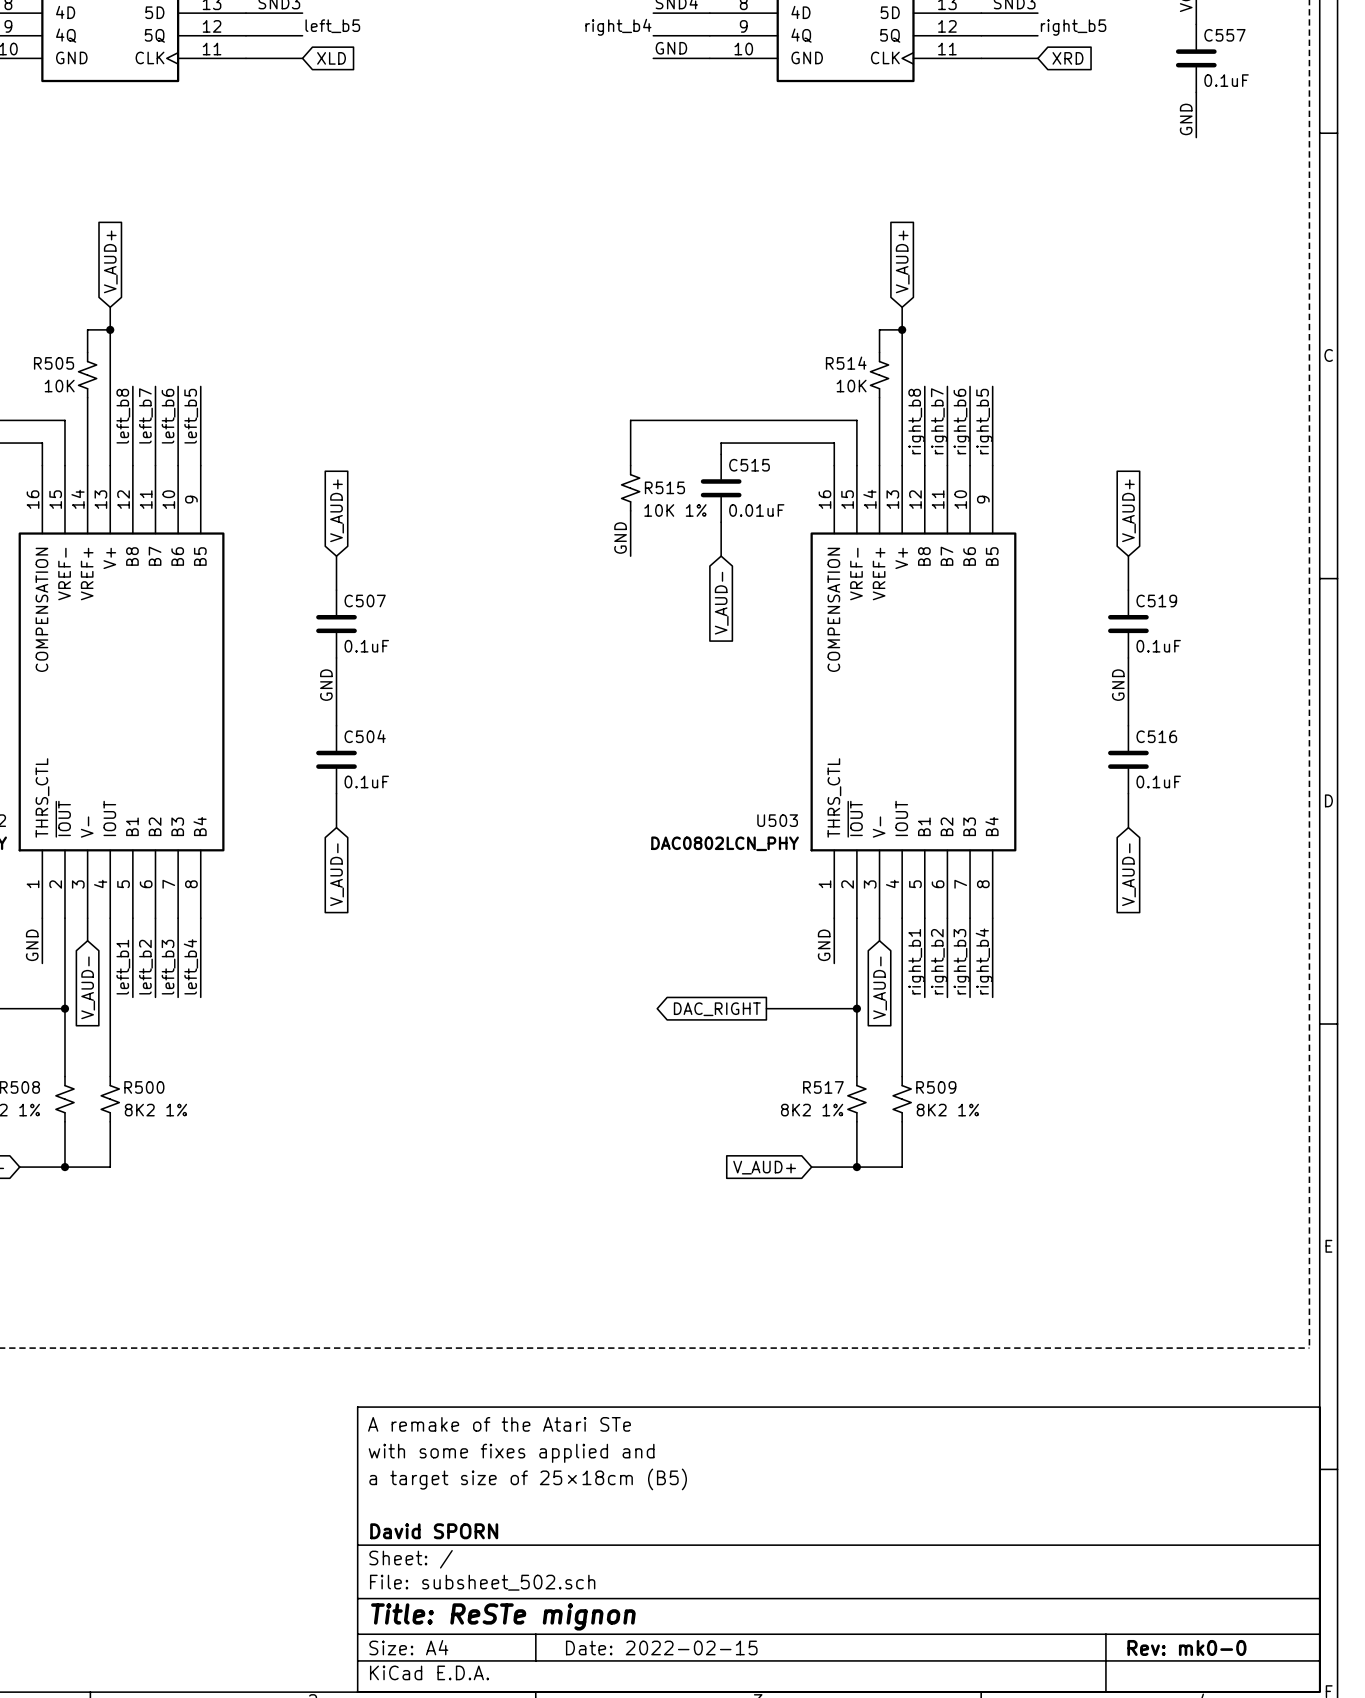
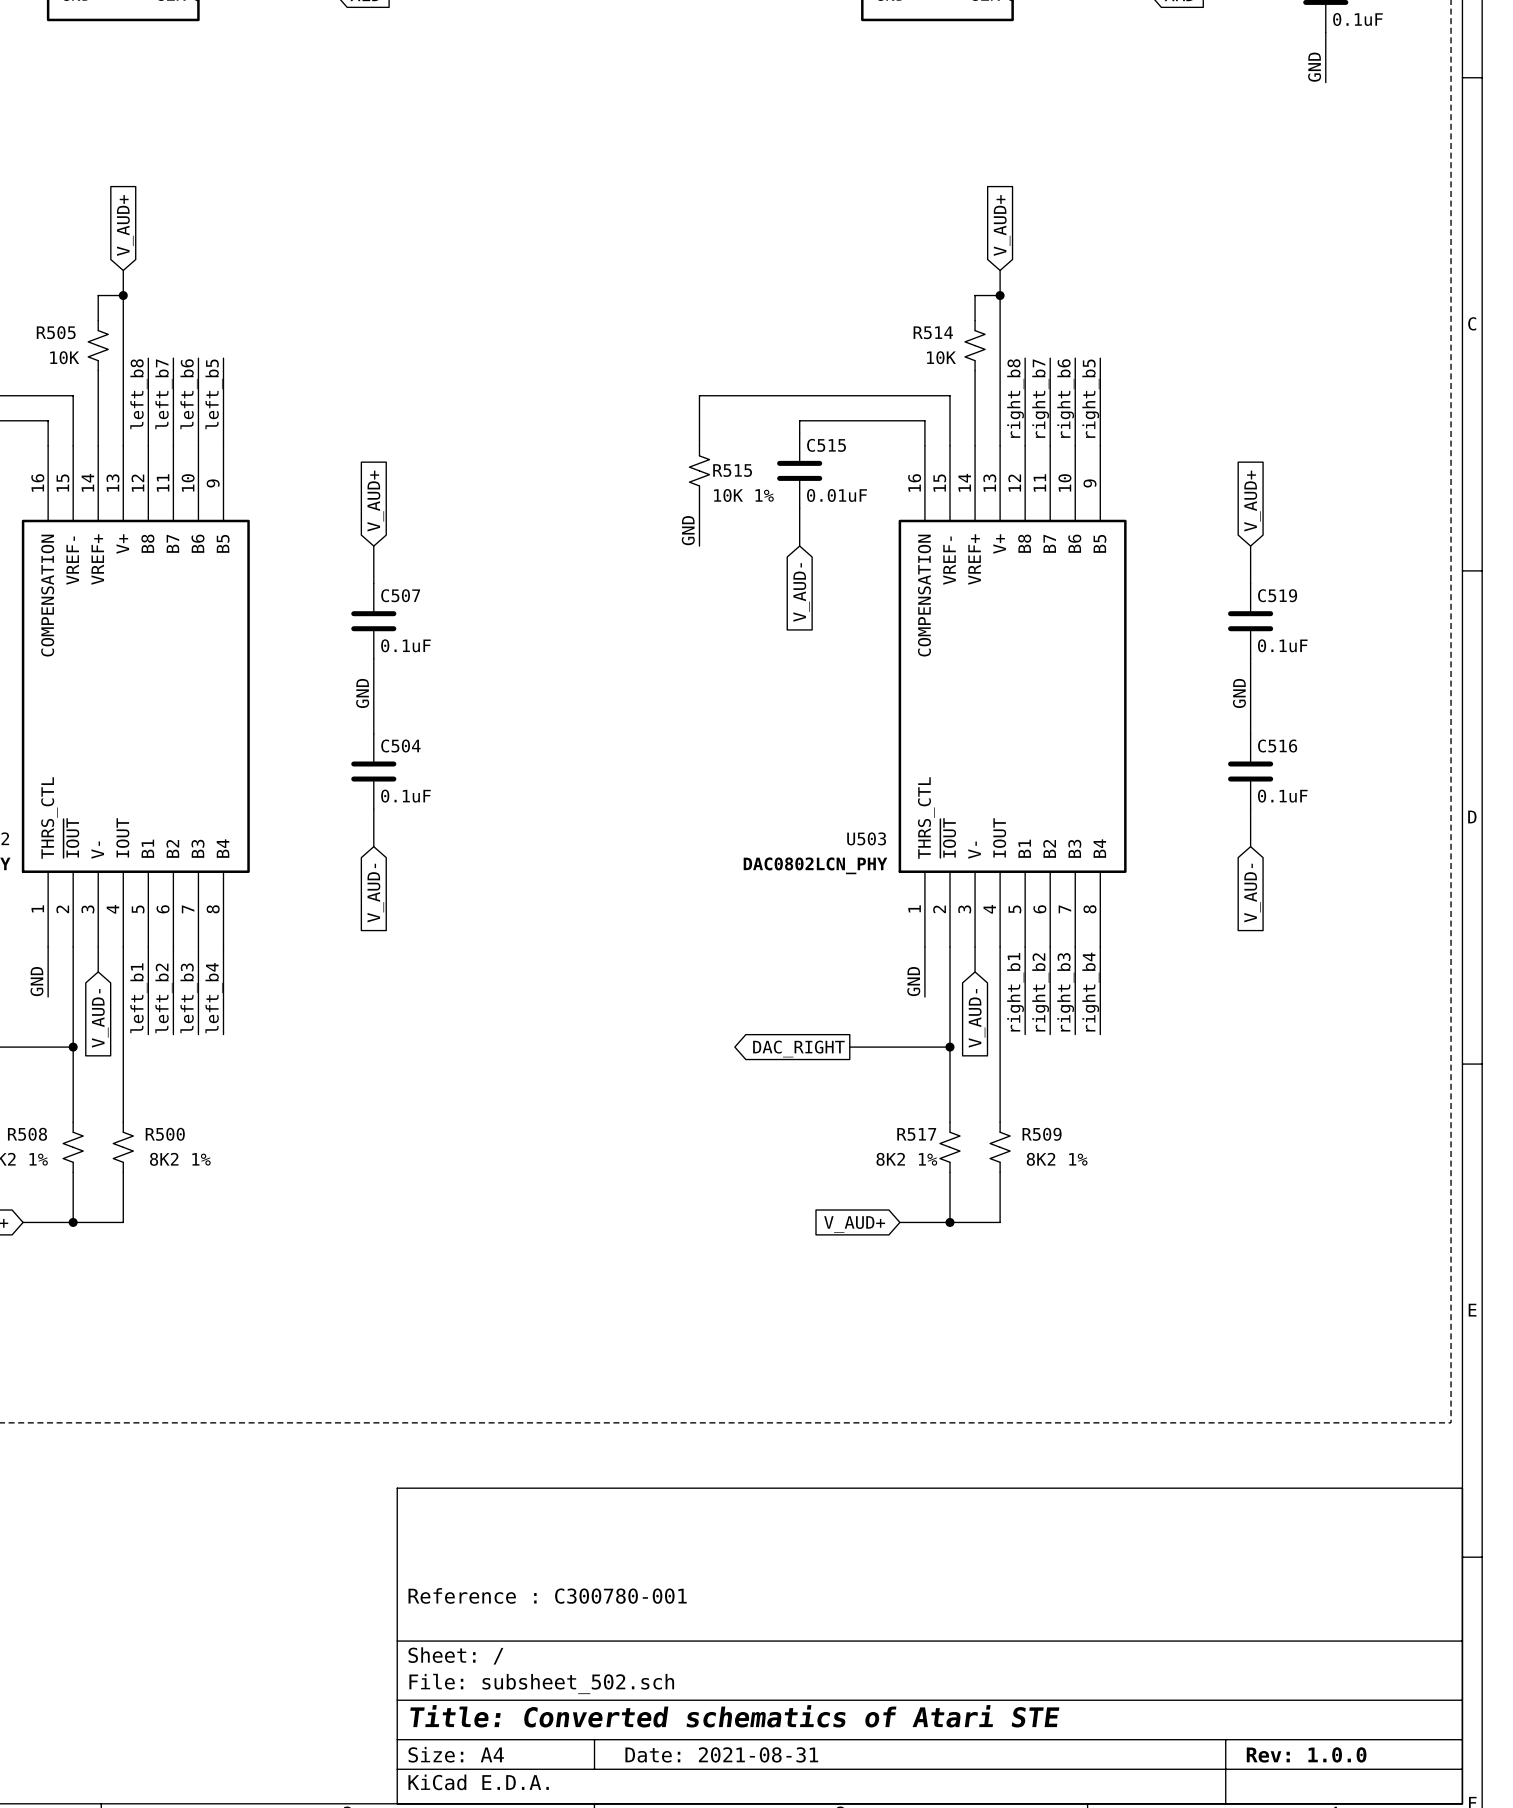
title block: A remake of the Atari STe (499, 1424) -> none
title block: with some fixes applied and (511, 1453) -> none
title block: a target size of 25×18cm (B5) (528, 1479) -> none
title block: none -> Reference : C300780-001 (547, 1595)
title block: David SPORN (434, 1531) -> none
title block: Title: ReSTe mignon (503, 1616) -> Title: Converted schematics of Atari STE (734, 1716)
title block: Date: 2022-02-15 (661, 1647) -> Date: 2021-08-31 (721, 1754)
title block: Rev: mk0-0 (1186, 1647) -> Rev: 1.0.0 (1306, 1754)

